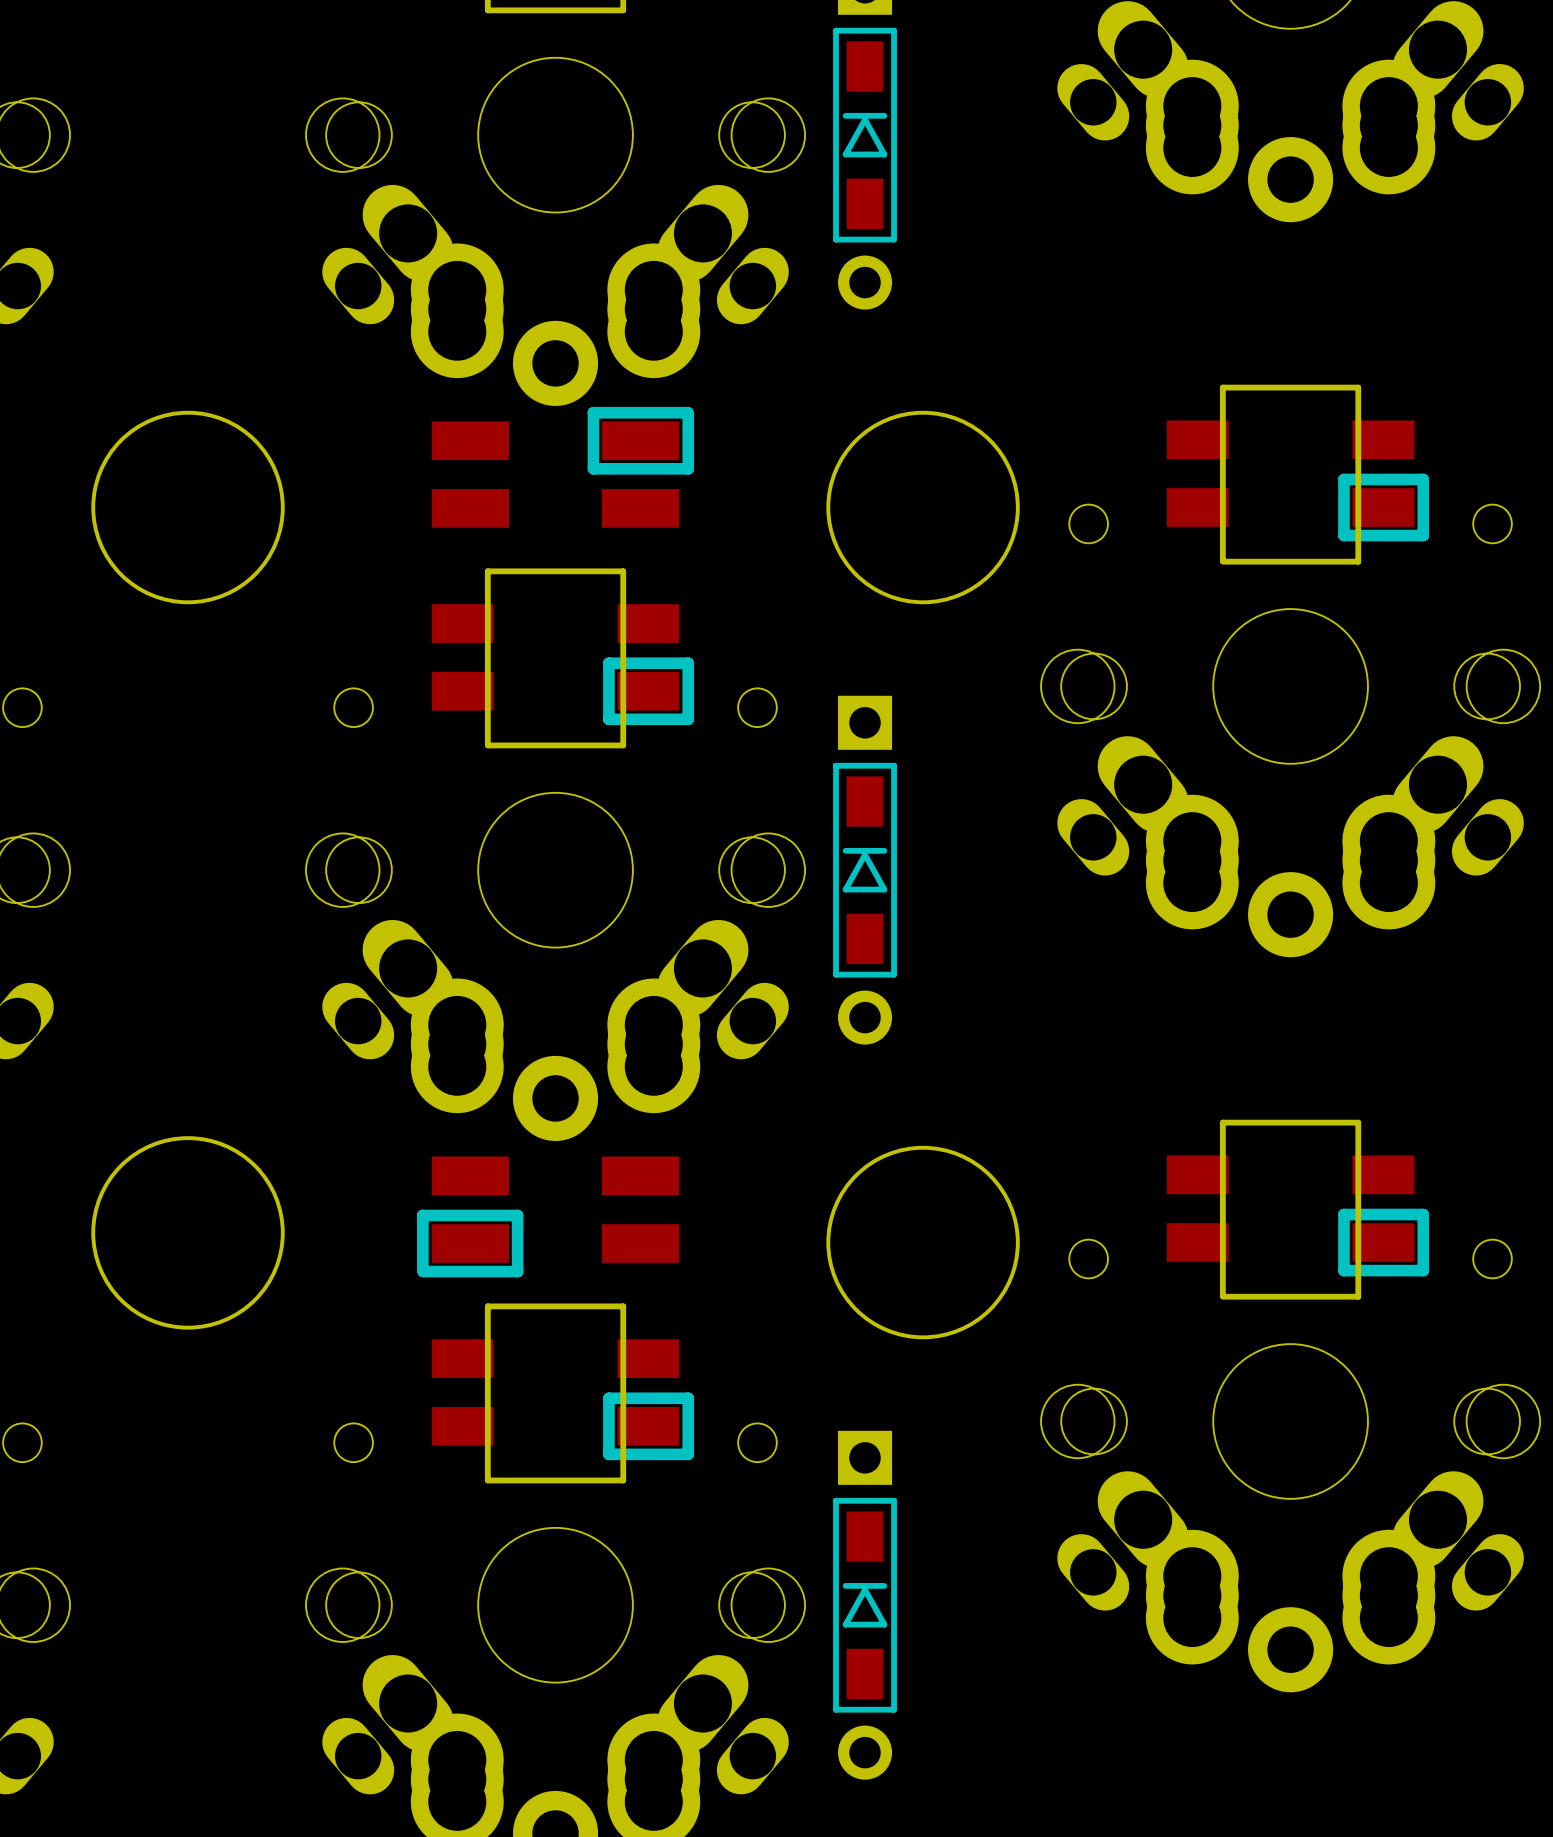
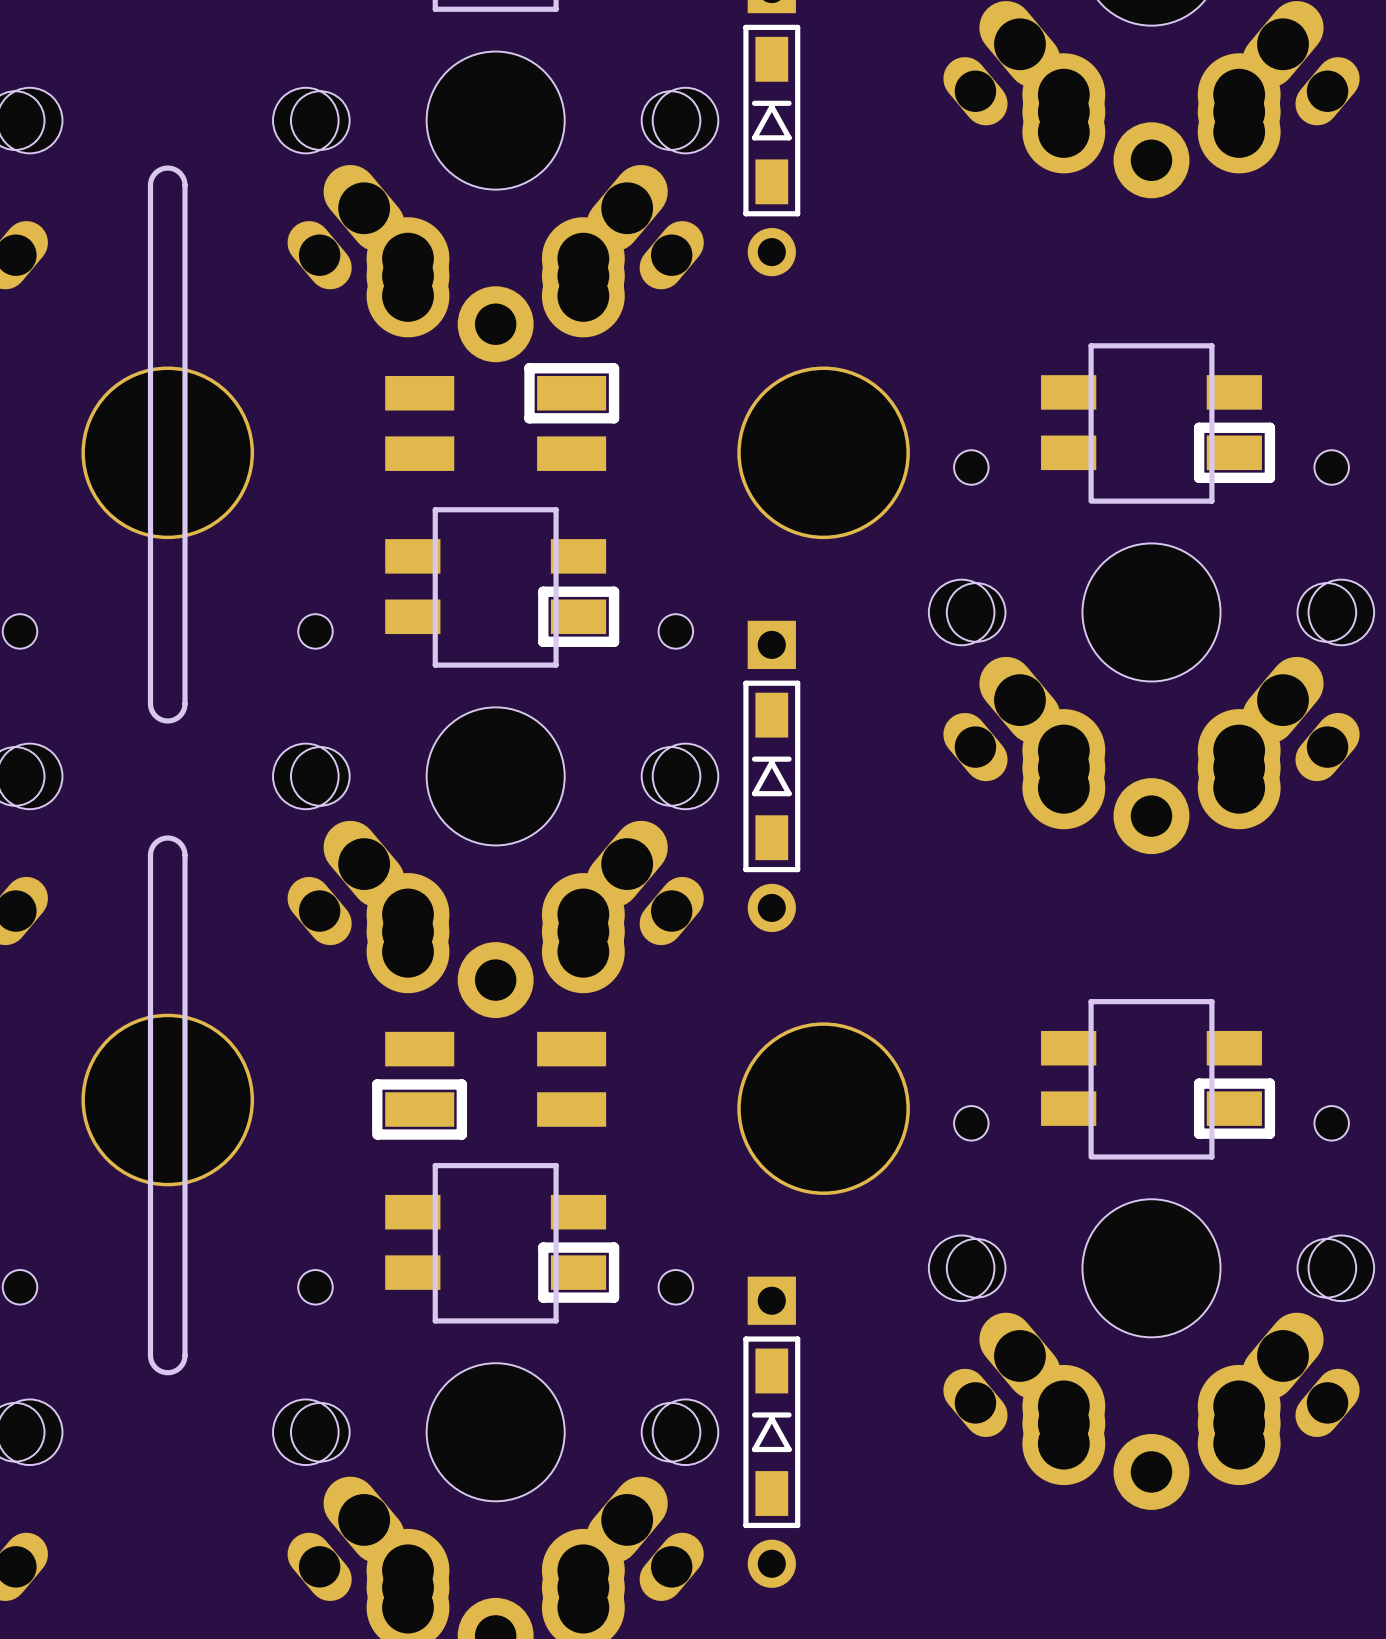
board edge: none -> (150, 185) (150, 703) (155, 715) (167, 721) (179, 715) (185, 703) (185, 185) (179, 173) (167, 168) (155, 173) (150, 185)
board edge: none -> (150, 855) (150, 1355) (155, 1367) (167, 1372) (179, 1367) (185, 1355) (185, 855) (179, 843) (167, 838) (155, 843) (150, 855)

